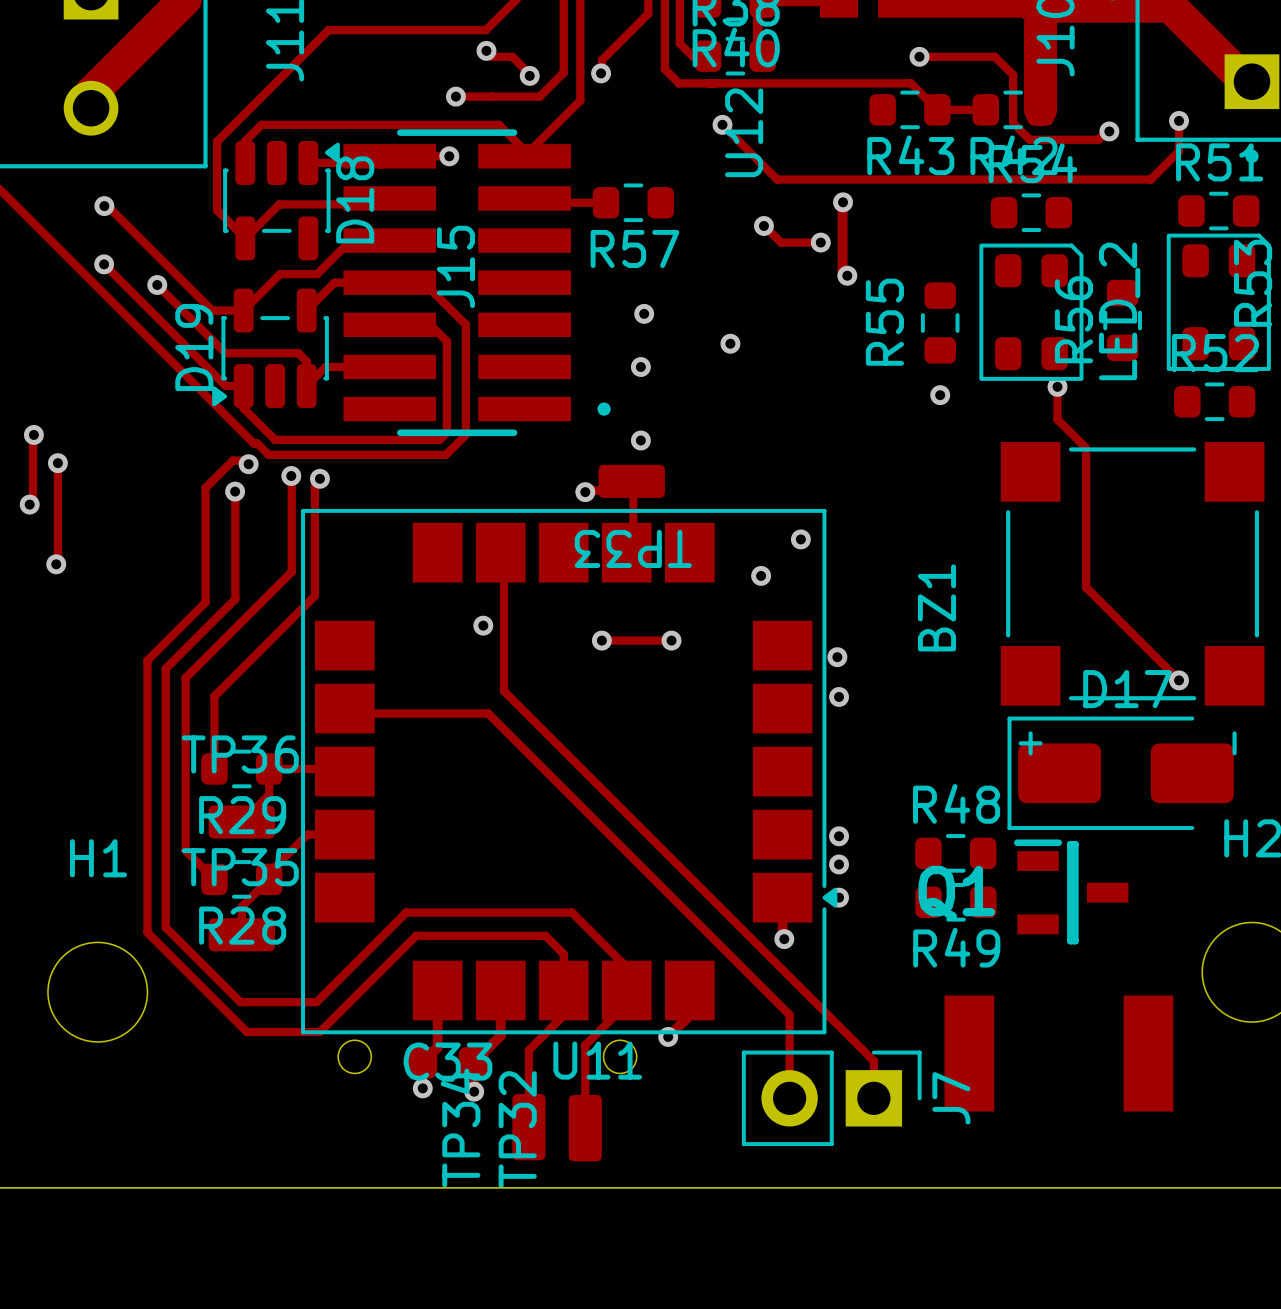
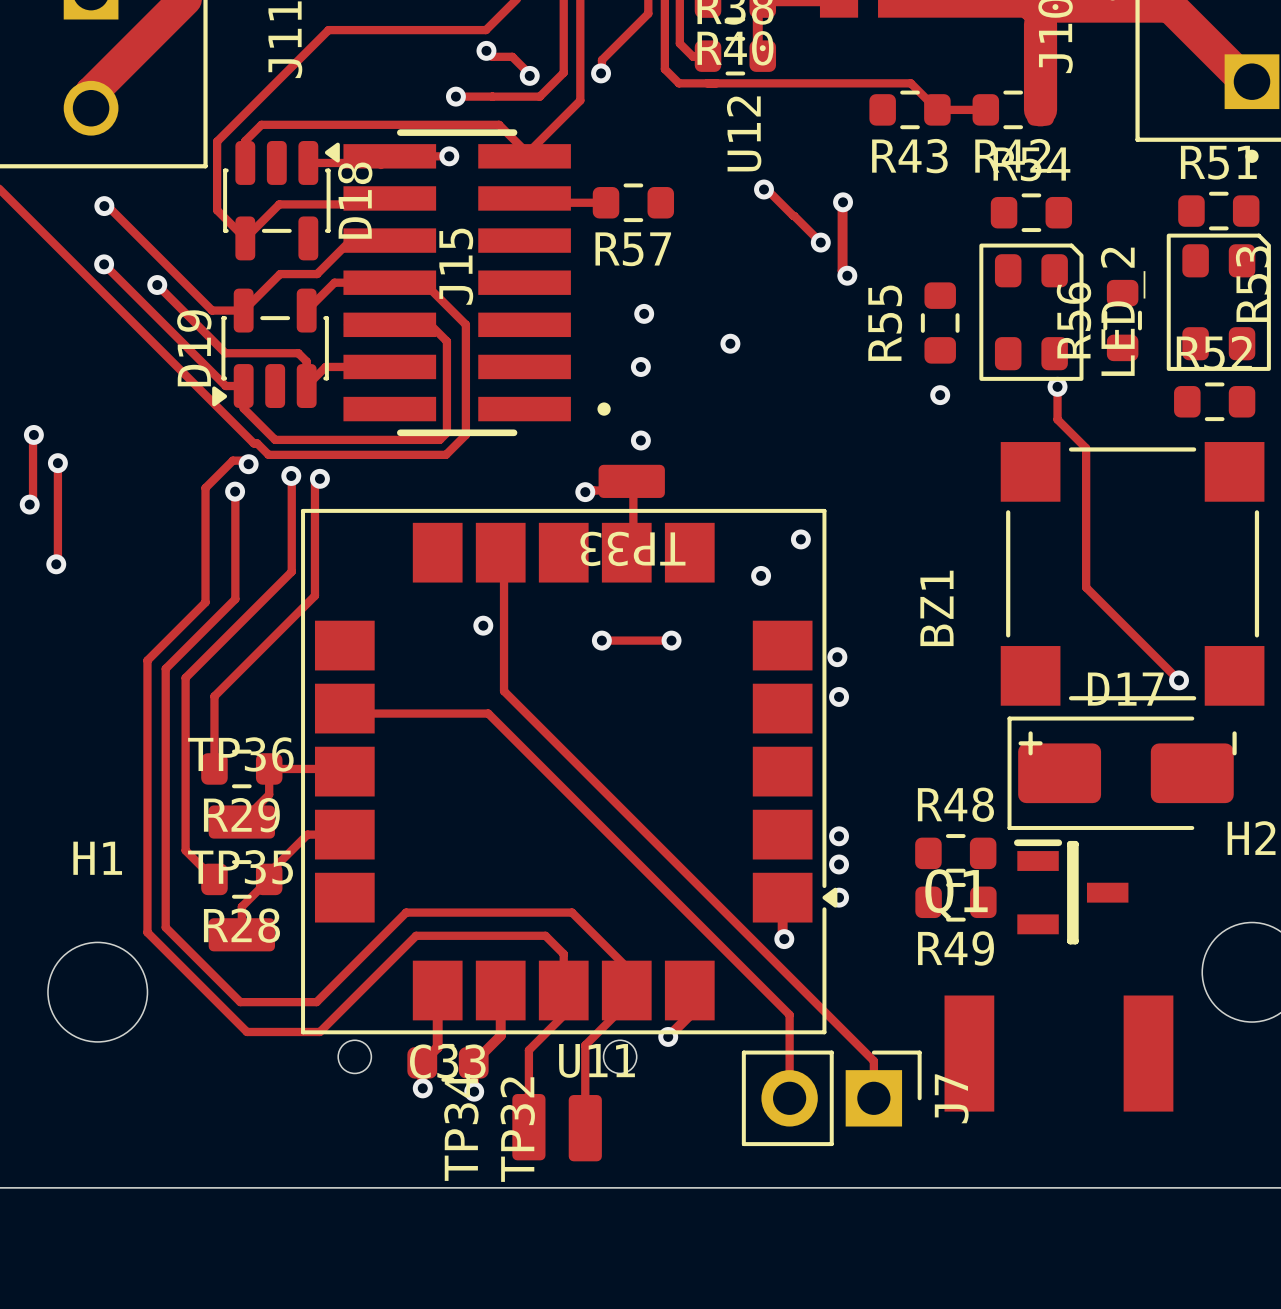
track: (919, 56) (994, 56) (1013, 75) (1013, 123) (1029, 139) (1098, 139) (1106, 131) (1109, 131) -> none
via: (919, 56) -> none
track: (1179, 120) (1179, 151) (1150, 179) (777, 179) (722, 124) -> none
via: (1179, 120) -> none
via: (722, 124) -> none
via: (1109, 131) -> none
via position: (763, 225) -> (763, 189)
track: (764, 225) (780, 242) (820, 242) -> (763, 189) (766, 189) (820, 242)

